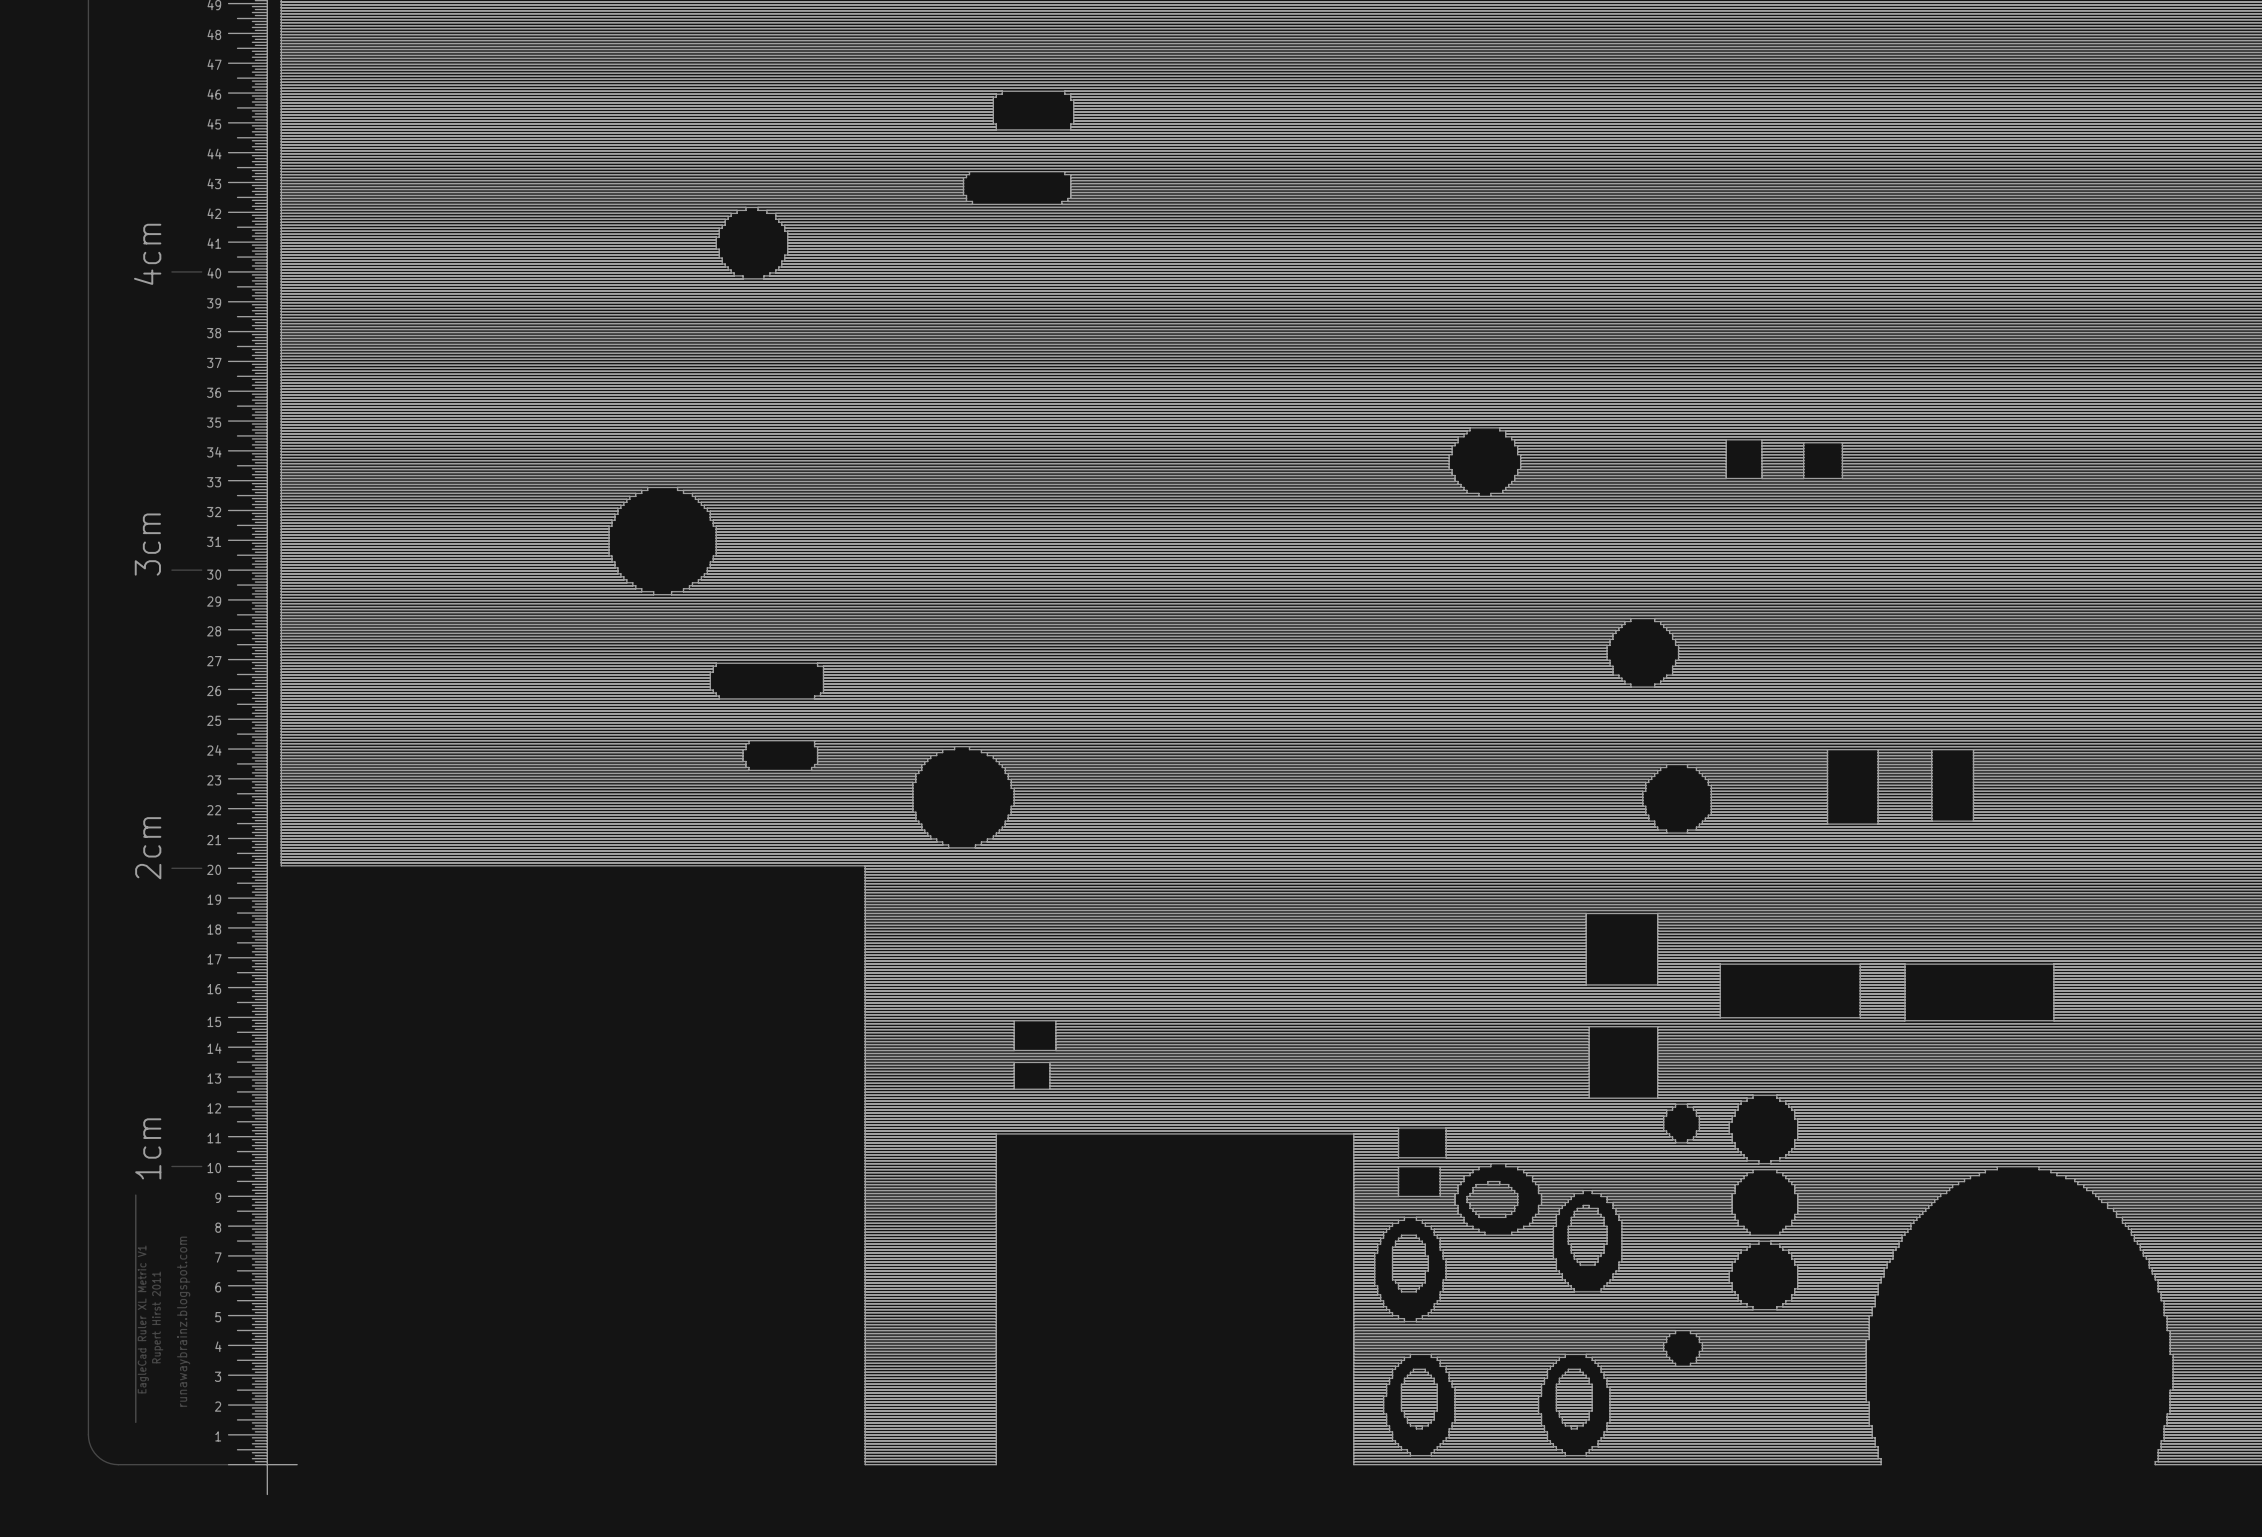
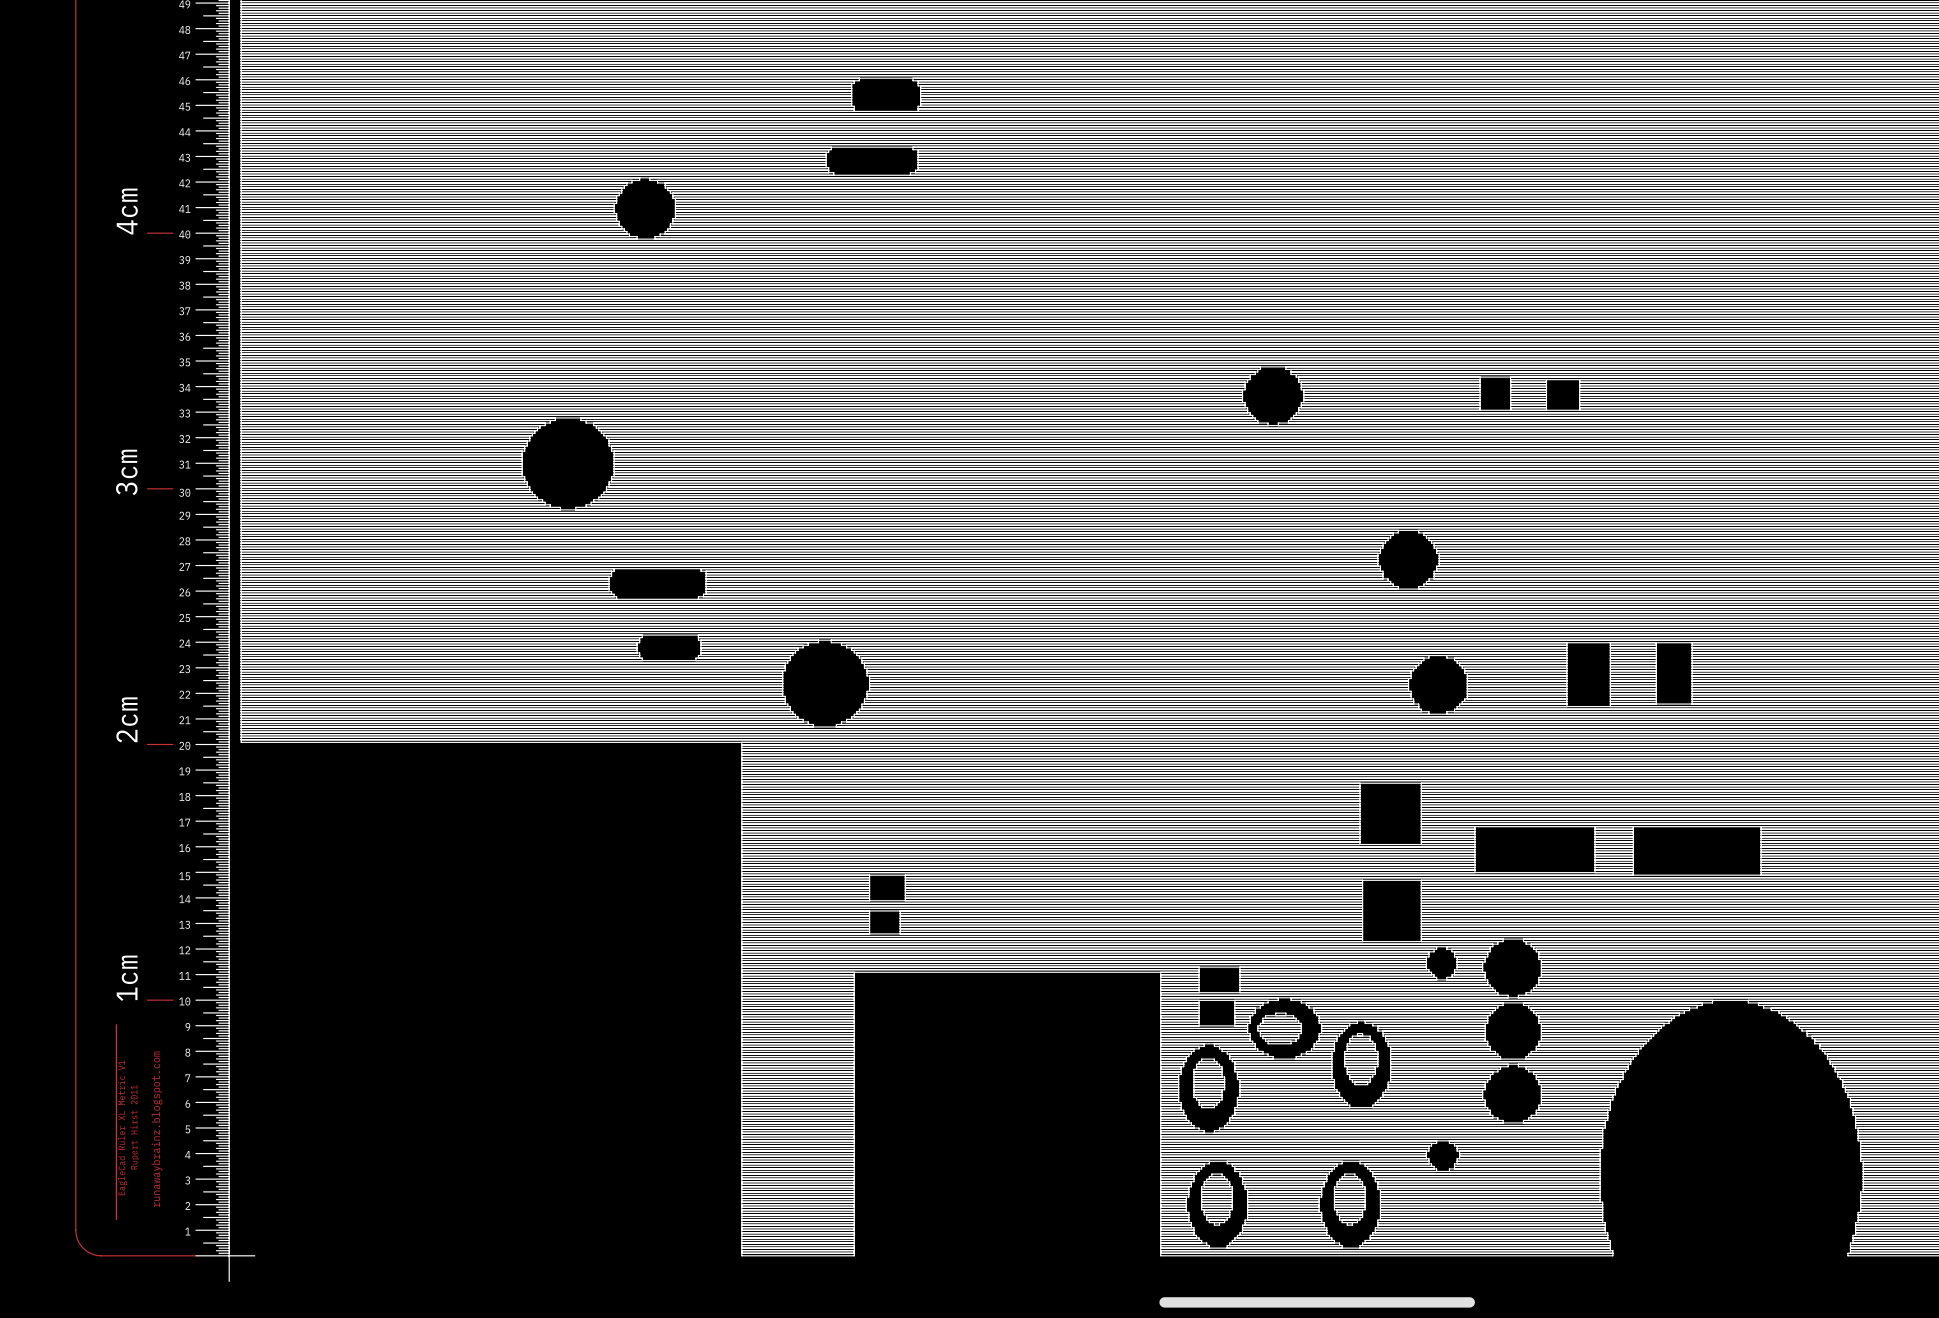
line: none -> (1164, 1302) (1469, 1302)

